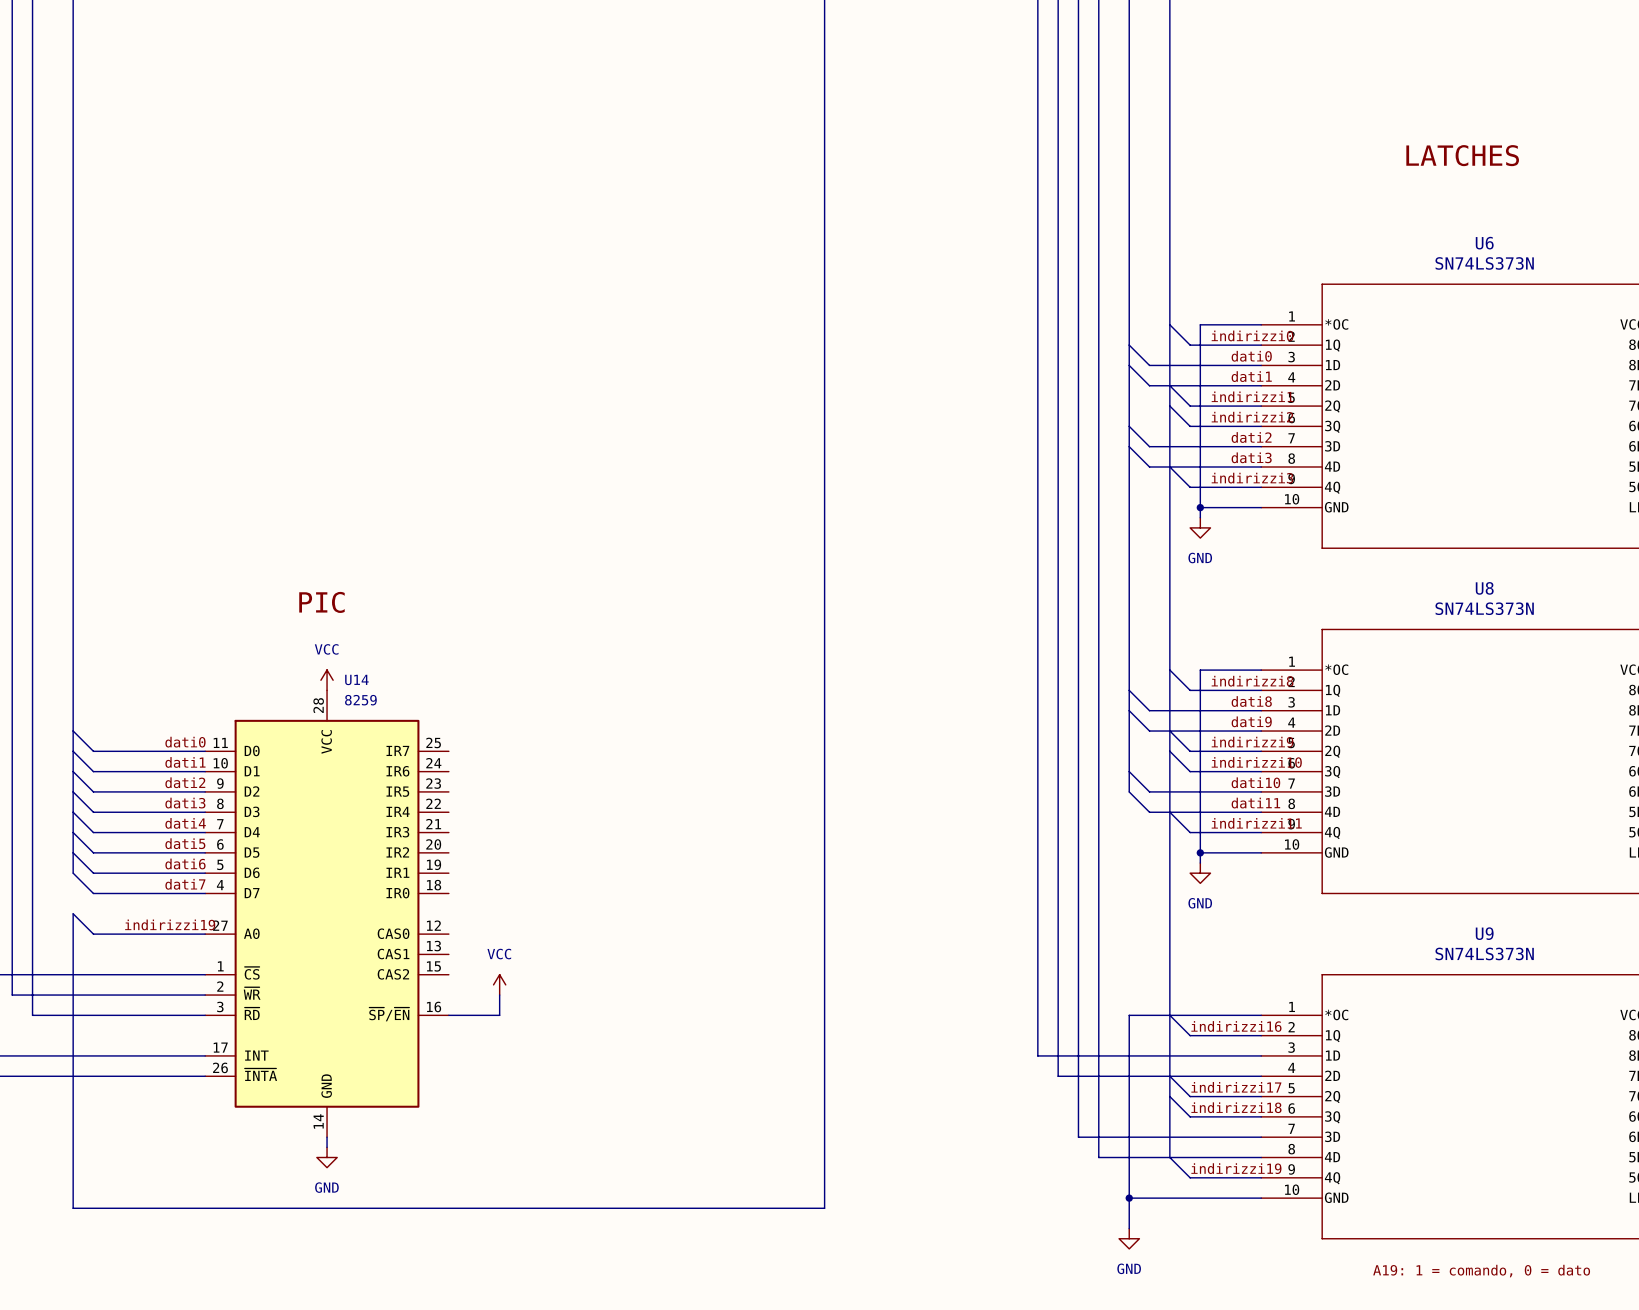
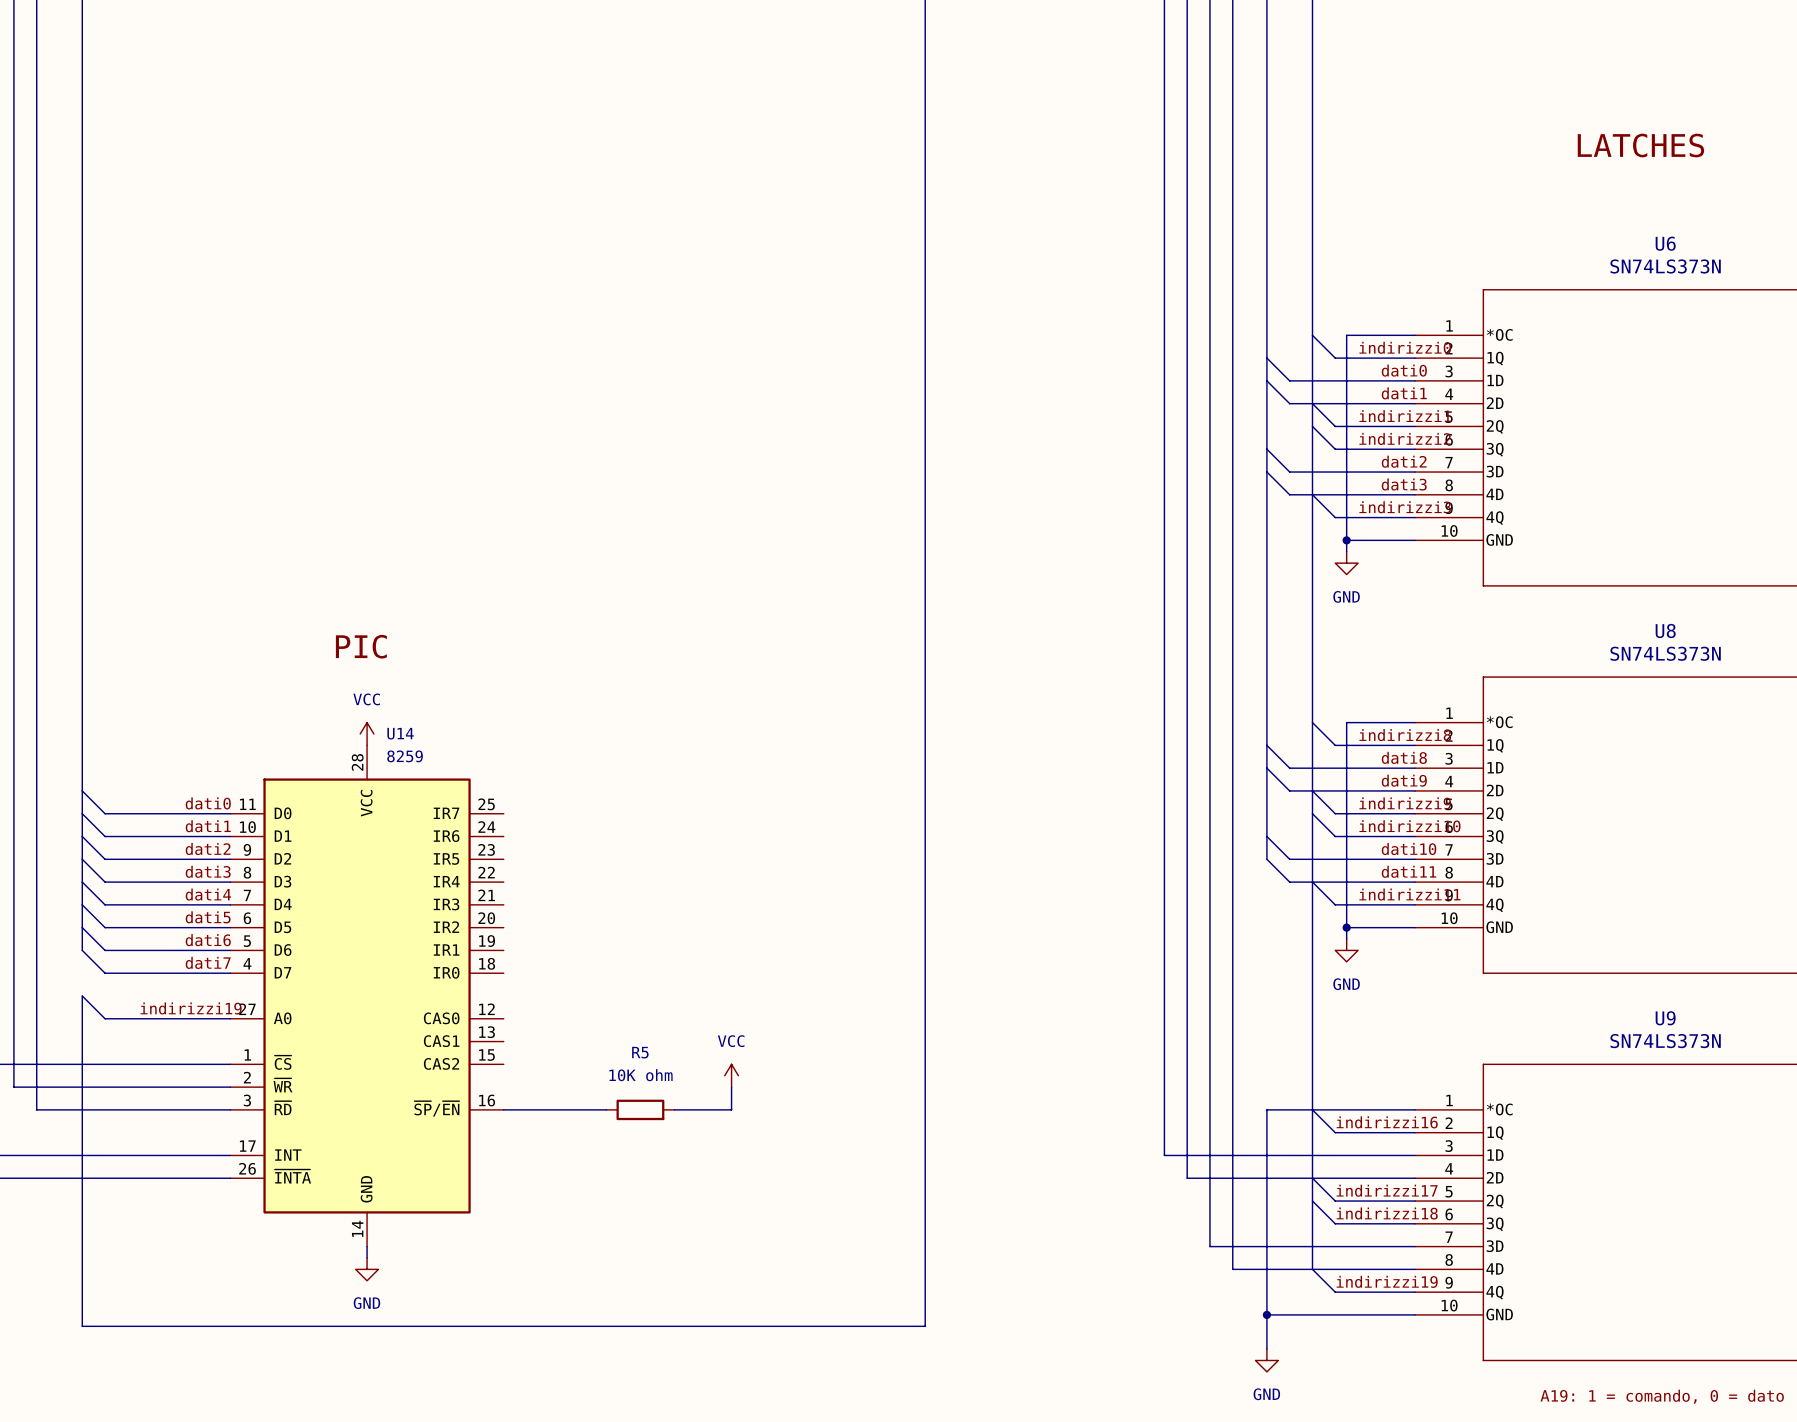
power symbol position: VCC (499, 984) -> VCC (731, 1075)
wire: (499, 995) (499, 1015) -> (606, 1109) (560, 1109)
wire: none -> (731, 1087) (731, 1109) (674, 1109)
R5: none -> 10K ohm (640, 1109)

